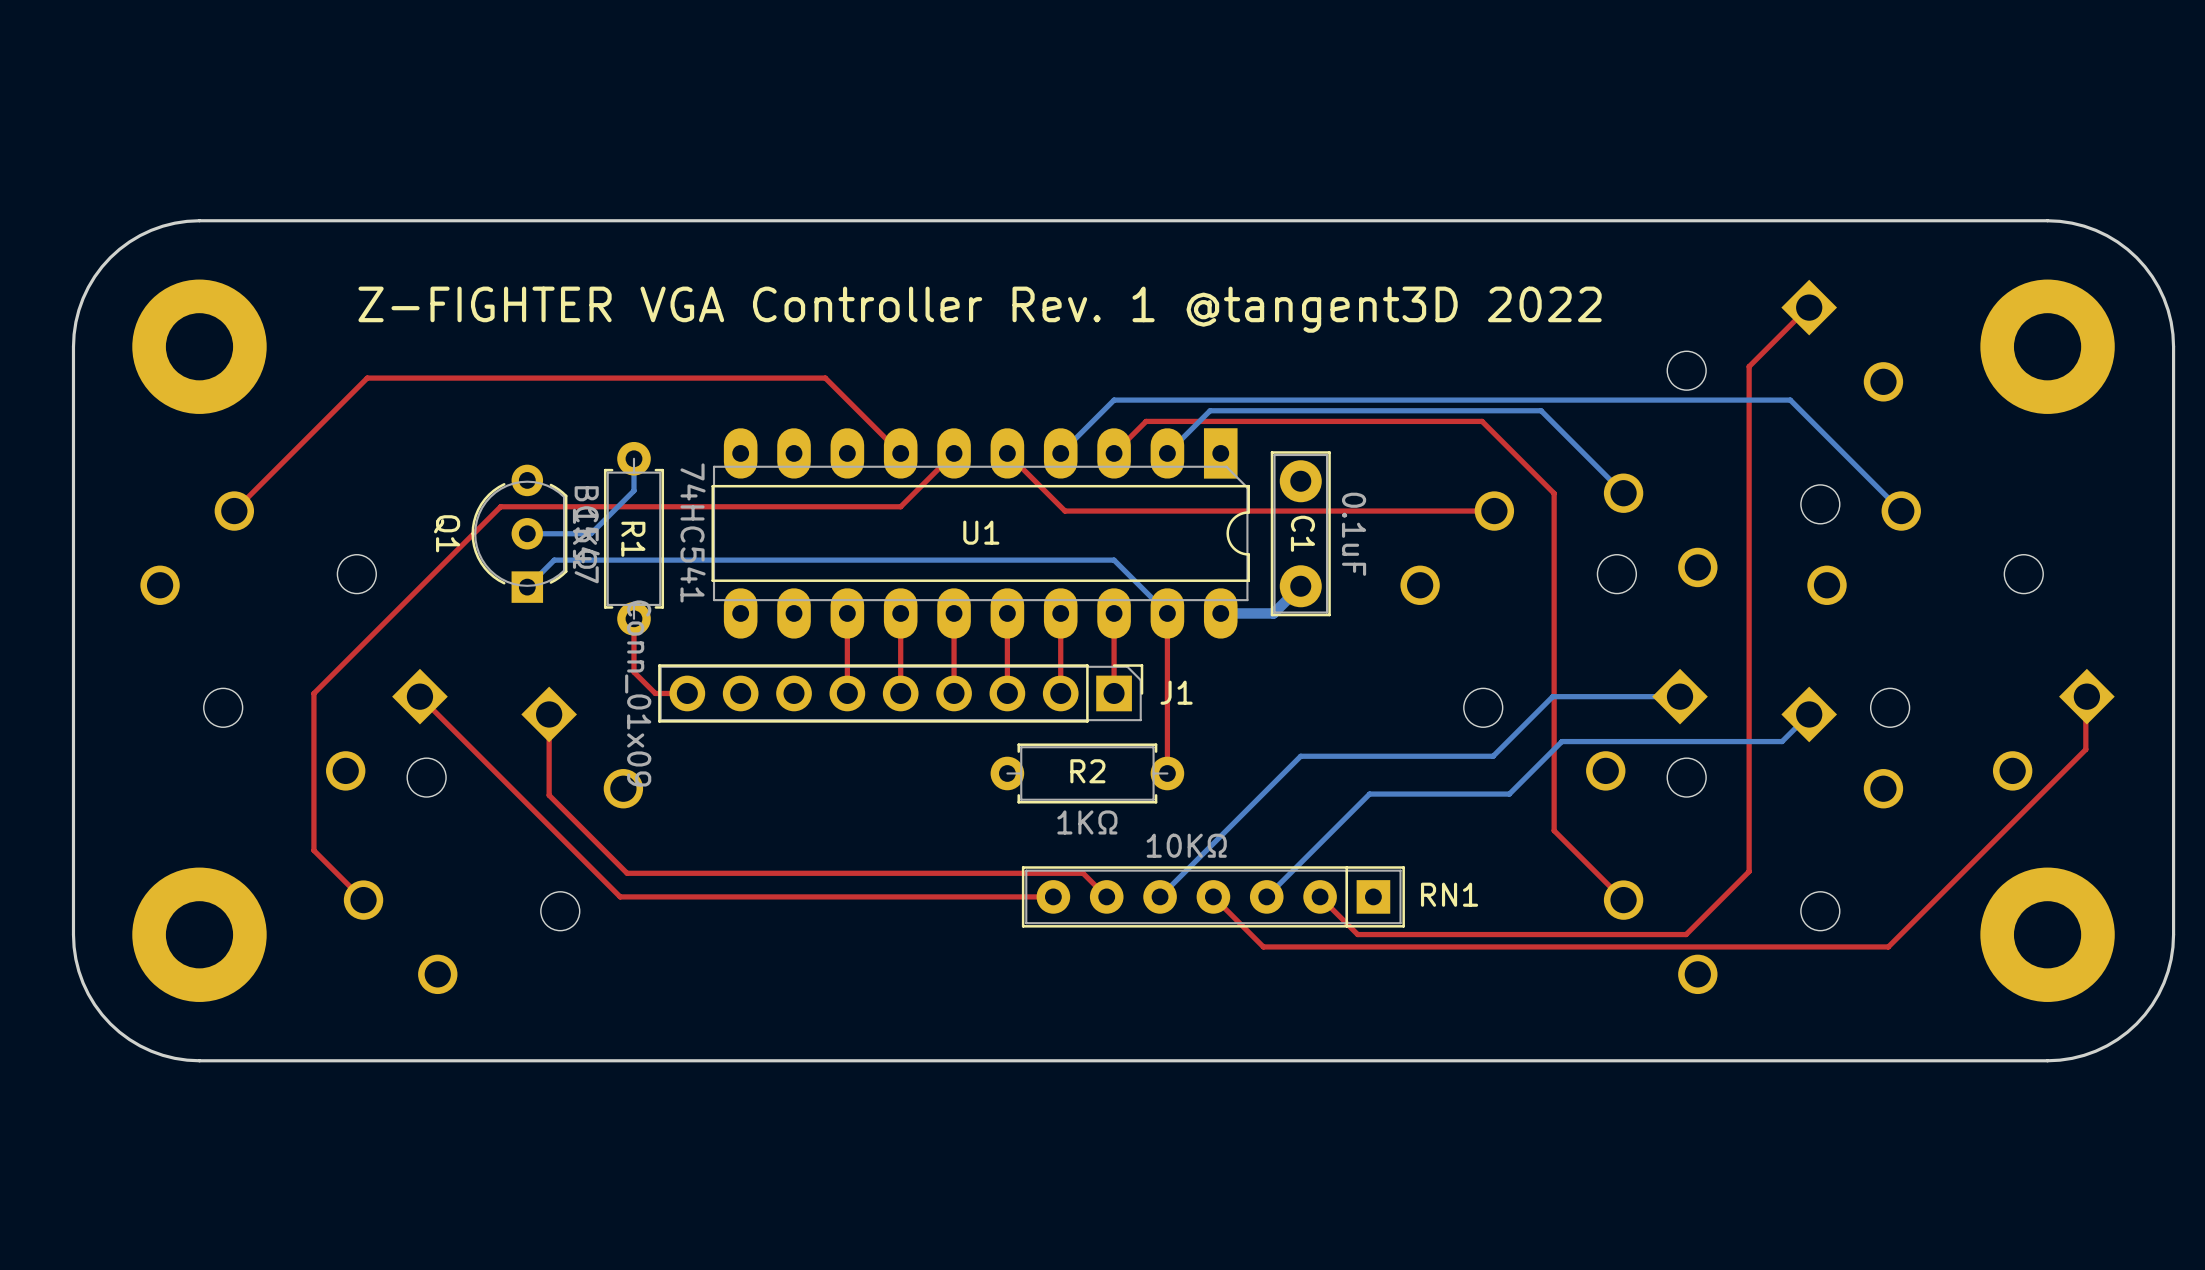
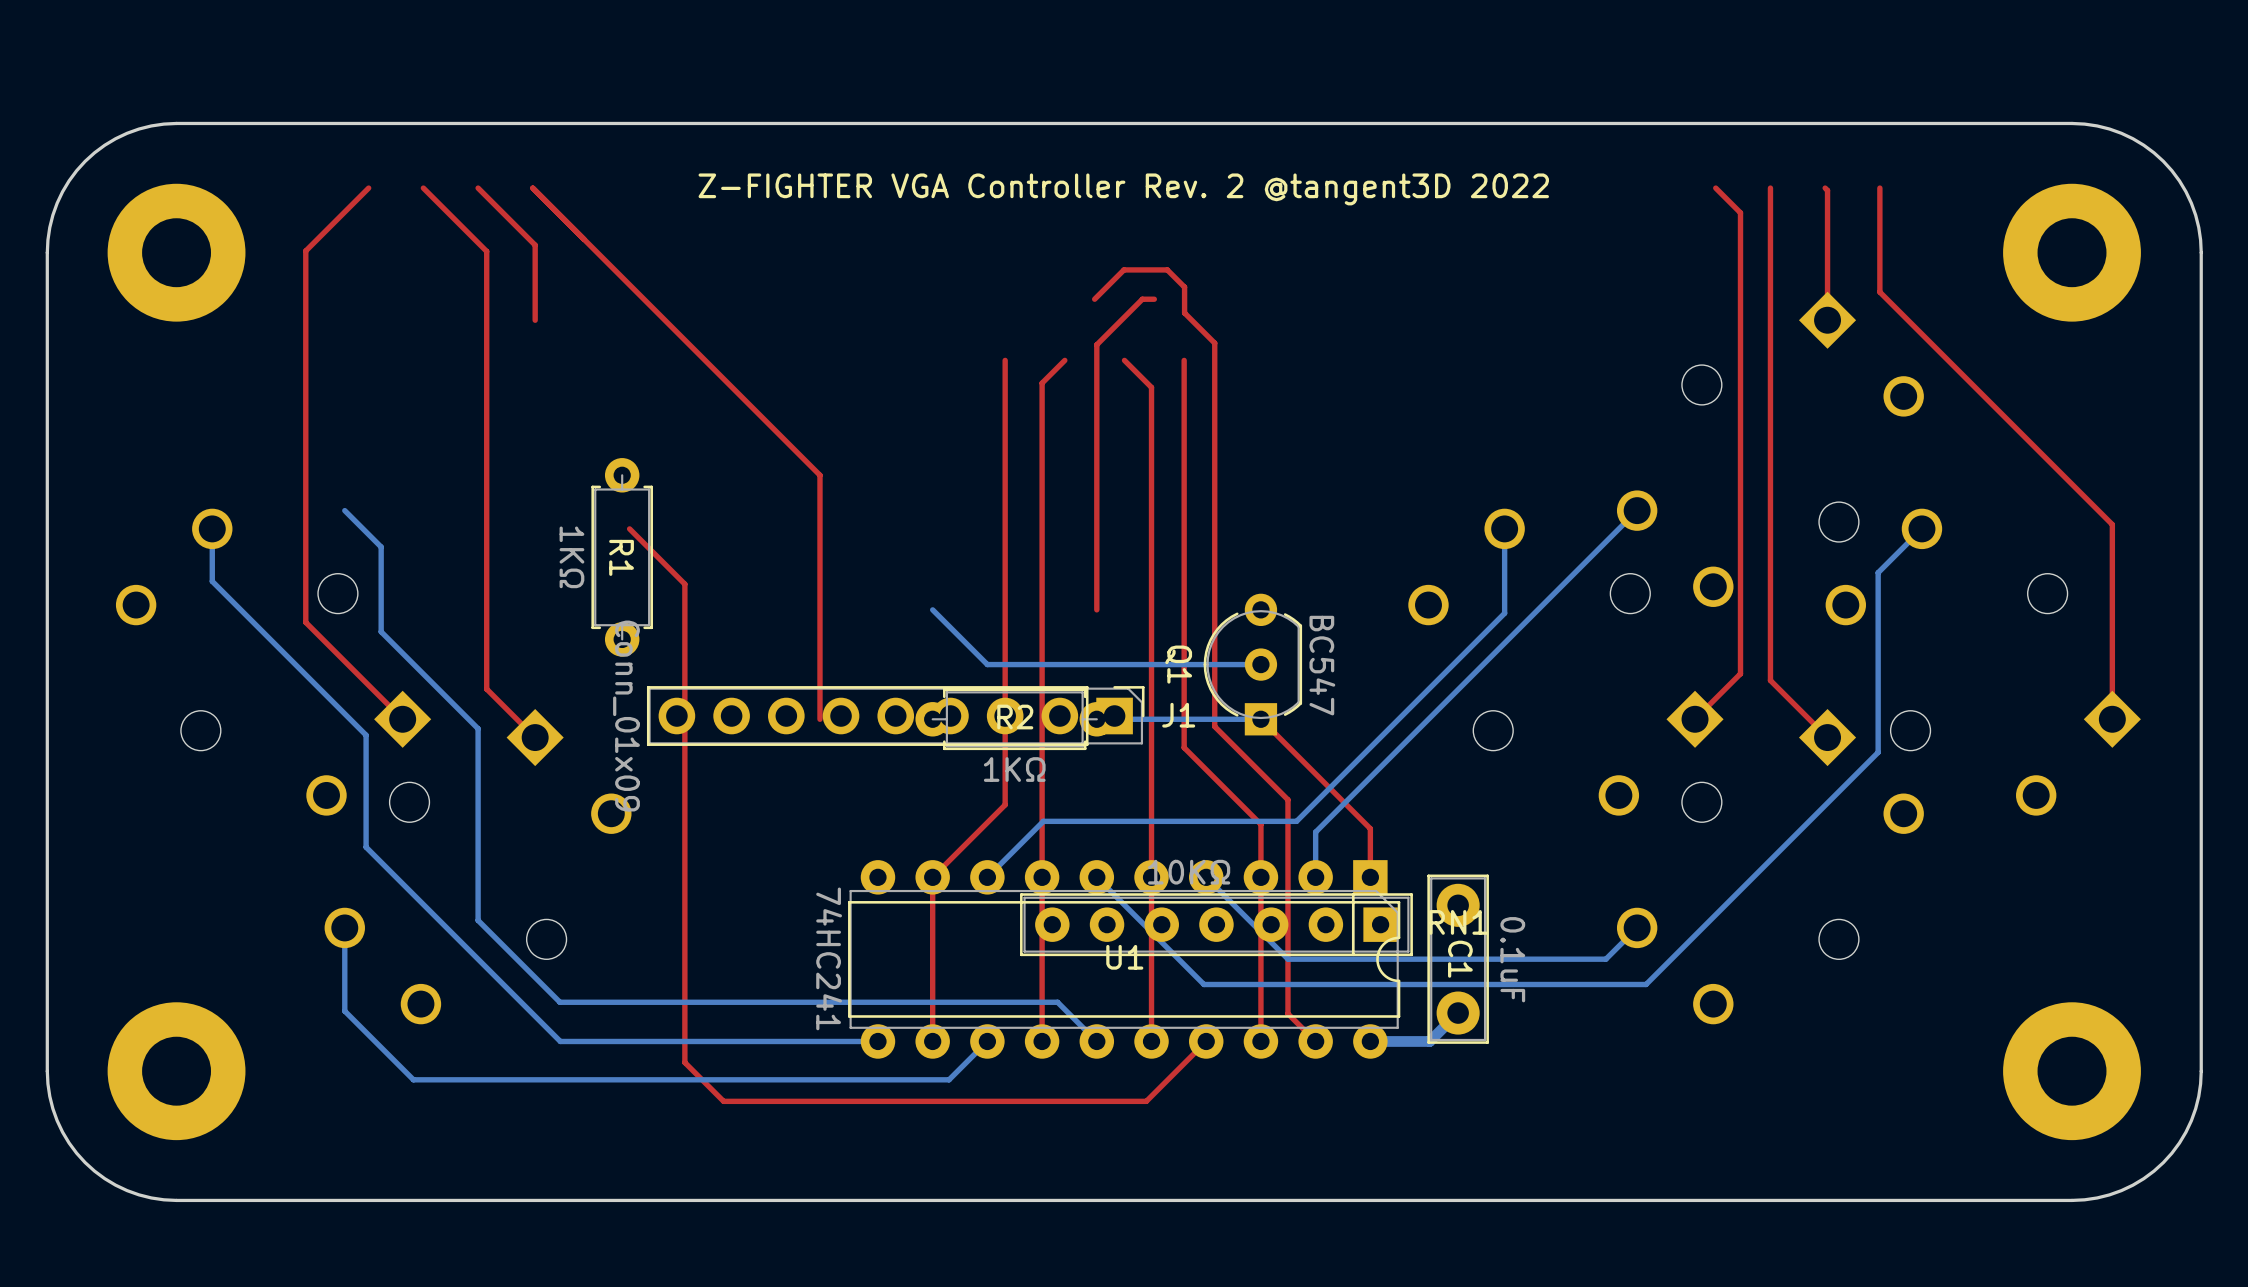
top track: none -> (478, 188) (535, 245) (535, 320)
top track: none -> (532, 188) (819, 475) (819, 719)
top track: none -> (1715, 188) (1740, 212) (1740, 673) (1695, 719)
top track: none -> (1770, 188) (1770, 680) (1827, 737)
top track: none -> (1825, 188) (1827, 190) (1827, 320)
top track: none -> (1879, 188) (1879, 292) (2112, 524) (2112, 719)
text: none -> Z-FIGHTER VGA Controller Rev. 2 @tangent3D 2022 (1123, 189)
top track: none -> (1094, 299) (1123, 269) (1167, 269) (1184, 287) (1184, 313) (1214, 343) (1214, 726) (1287, 799) (1287, 1013) (1315, 1041)
top track: none -> (1154, 299) (1142, 299) (1096, 344) (1096, 609)
top track: (1808, 307) (1749, 366) (1749, 871) (1686, 934) (1357, 934) (1320, 896) -> none
text: Z-FIGHTER VGA Controller Rev. 1 @tangent3D 2022 (980, 309) -> none
part position: (199, 346) -> (176, 252)
top track: none -> (1005, 360) (1005, 633)
top track: none -> (1064, 360) (1042, 383) (1042, 1041)
top track: none -> (1124, 360) (1151, 387) (1151, 1041)
top track: none -> (1184, 360) (1184, 747) (1260, 824) (1260, 1041)
part position: (2047, 346) -> (2072, 252)
board edge: (2173, 346) (2171, 322) (2163, 298) (2152, 276) (2136, 257) (2117, 241) (2095, 230) (2072, 223) (2047, 220) (187, 221) (162, 226) (140, 235) (119, 249) (102, 266) (83, 298) (75, 322) (73, 346) -> (2201, 360) (2200, 240) (2195, 215) (2185, 191) (2163, 161) (2132, 138) (2097, 125) (2072, 123) (163, 124) (139, 129) (104, 145) (76, 170) (62, 191) (52, 215) (47, 240) (47, 360)
U1 footprint: [711, 428, 1250, 639] -> [848, 860, 1401, 1059]
top track: (900, 453) (825, 378) (367, 378) (234, 511) -> none
top track: (954, 453) (900, 506) (500, 506) (313, 693) (313, 850) (363, 900) -> none
top track: (1007, 453) (1064, 511) (1494, 511) -> none
bottom track: (1060, 453) (1114, 400) (1790, 400) (1901, 511) -> (1096, 877) (1203, 984) (1646, 984) (1878, 752) (1878, 572) (1921, 528)
top track: (1114, 453) (1146, 421) (1482, 421) (1554, 493) (1554, 830) (1623, 900) -> none
bottom track: (1167, 453) (1210, 410) (1541, 410) (1623, 493) -> (1315, 877) (1315, 832) (1637, 510)
bottom track: (633, 458) (633, 490) (591, 533) (527, 533) -> none
bottom track: none -> (344, 510) (381, 547) (381, 631) (478, 728) (478, 920) (559, 1002) (1057, 1002) (1096, 1041)
bottom track: none -> (212, 528) (212, 581) (366, 735) (366, 847) (560, 1041) (877, 1041)
top track: none -> (629, 528) (684, 584) (684, 1062) (723, 1101) (1146, 1101) (1206, 1041)
bottom track: none -> (1504, 528) (1504, 613) (1296, 821) (1043, 821) (987, 877)
U1 value: 74HC541 (693, 532) -> 74HC241 (829, 958)
Q1 position: (519, 533) -> (1252, 664)
C1 position: (1300, 533) -> (1458, 959)
bottom track: (1300, 586) (1273, 613) (1220, 613) -> none
bottom track: (527, 587) (554, 560) (1114, 560) (1167, 613) -> none
bottom track: none -> (932, 609) (987, 664) (1260, 664)
top track: (847, 613) (847, 693) -> none
top track: (900, 613) (900, 693) -> none
top track: (954, 613) (954, 693) -> none
top track: (1060, 613) (1060, 693) -> none
top track: (1114, 613) (1114, 693) -> none
top track: (1167, 613) (1167, 773) -> none
top track: (633, 618) (633, 672) (655, 693) (687, 693) -> none
top track: none -> (1005, 716) (1005, 804) (932, 877) (932, 1041)
top track: (419, 696) (620, 896) (1053, 896) -> (402, 719) (305, 622) (305, 250) (368, 188)
bottom track: none -> (1260, 719) (1096, 719)
top track: none -> (1260, 719) (1370, 828) (1370, 877)
bottom track: (1678, 696) (1552, 696) (1493, 756) (1300, 756) (1160, 896) -> none
top track: (2085, 696) (2085, 749) (1888, 946) (1263, 946) (1213, 896) -> none
top track: (549, 714) (549, 795) (627, 873) (1083, 873) (1106, 896) -> (535, 737) (486, 689) (486, 251) (423, 188)
bottom track: (1808, 714) (1782, 741) (1561, 741) (1509, 794) (1369, 794) (1266, 896) -> none
R2 position: (1087, 773) -> (1014, 719)
bottom track: none -> (1206, 877) (1288, 959) (1605, 959) (1637, 927)
bottom track: none -> (344, 927) (344, 1011) (413, 1079) (949, 1079) (987, 1041)
part position: (199, 934) -> (176, 1071)
part position: (2047, 934) -> (2072, 1071)
board edge: (2173, 934) (2171, 959) (2163, 982) (2152, 1004) (2136, 1023) (2117, 1039) (2095, 1051) (2072, 1058) (2047, 1060) (187, 1060) (162, 1055) (140, 1045) (119, 1032) (102, 1014) (83, 982) (75, 959) (73, 934) -> (2201, 963) (2200, 1083) (2195, 1108) (2185, 1132) (2171, 1153) (2143, 1178) (2109, 1194) (2072, 1200) (163, 1199) (139, 1194) (104, 1178) (76, 1153) (62, 1132) (52, 1108) (47, 1083) (47, 963)
bottom track: none -> (1458, 1013) (1429, 1041) (1370, 1041)

